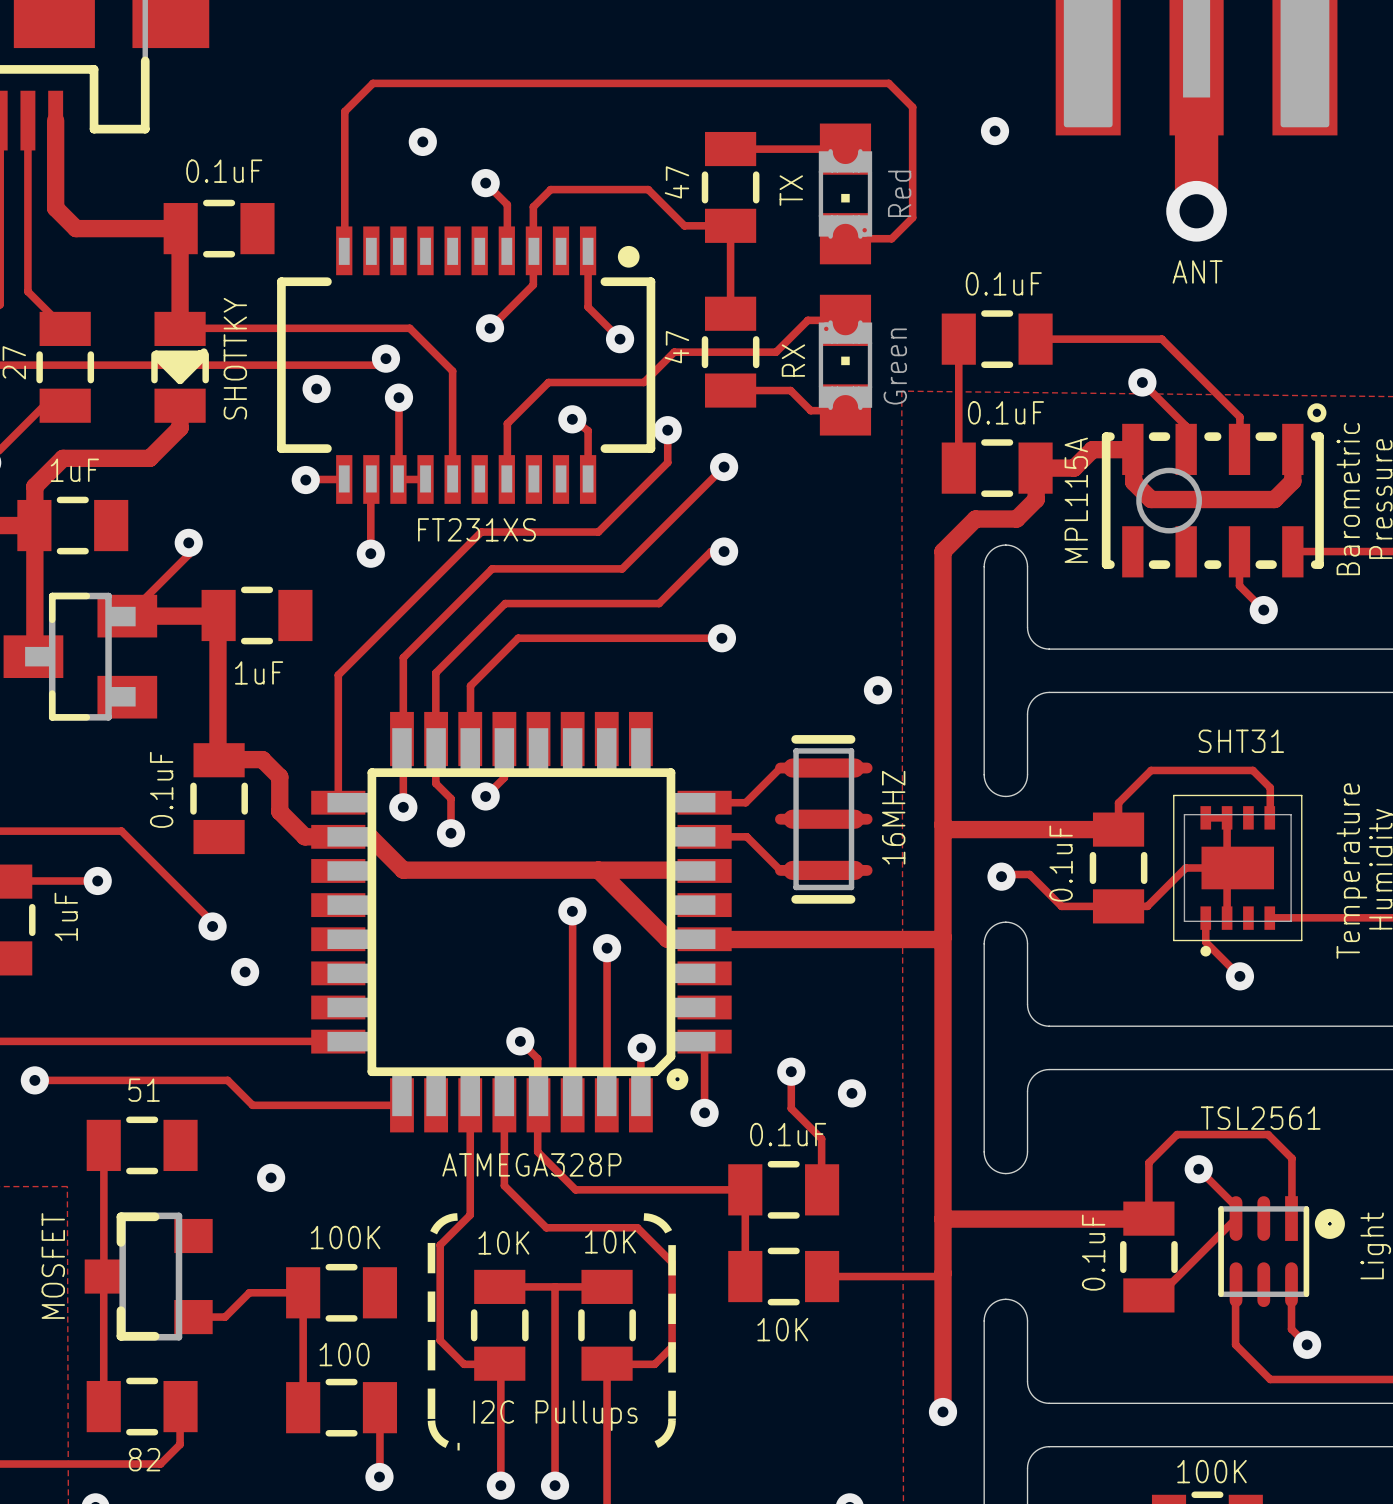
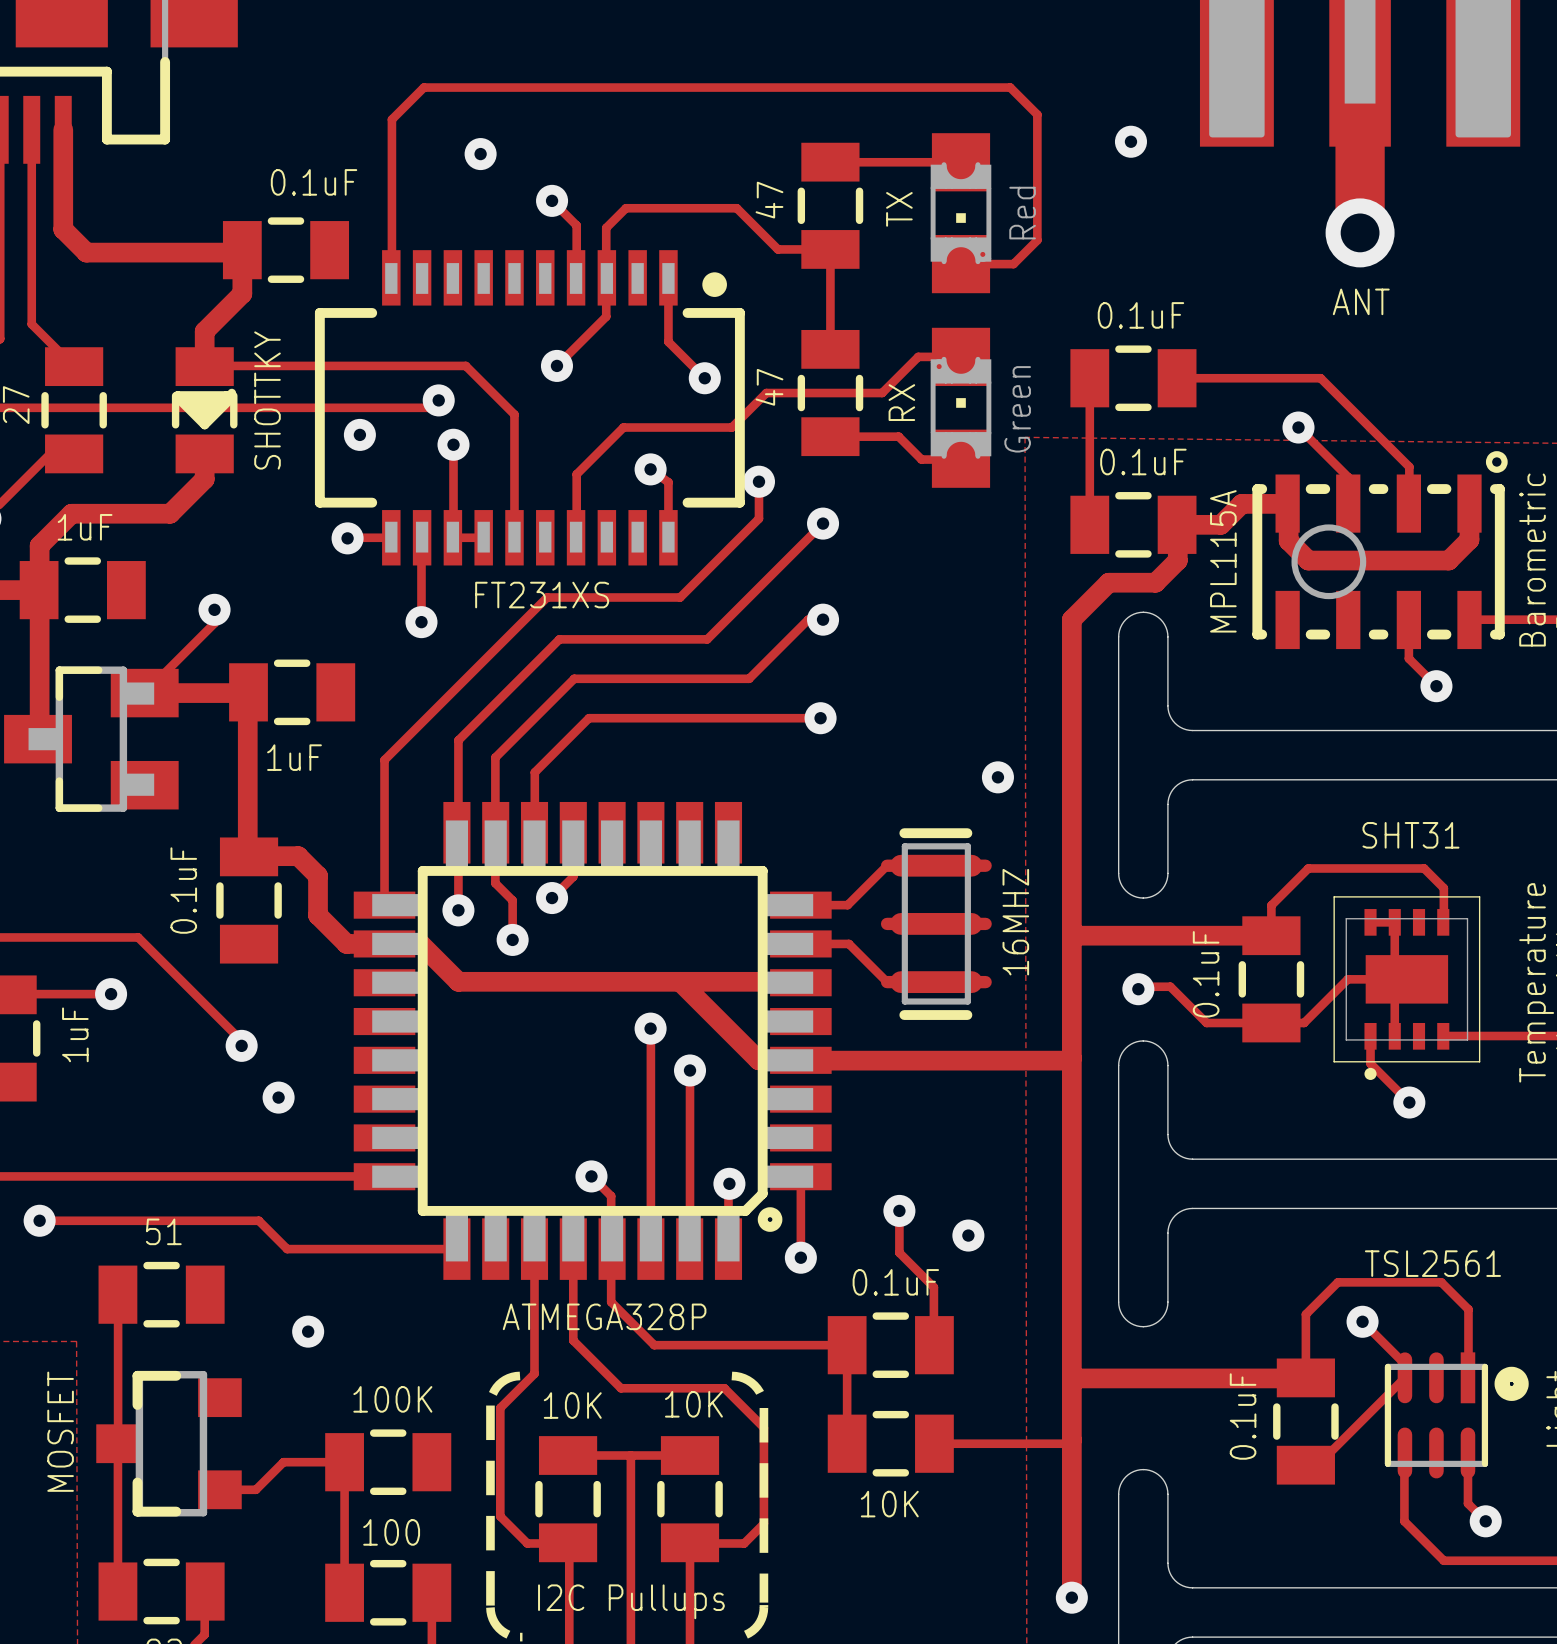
part value position: 0.1uF (224, 171) -> 0.1uF (314, 182)
track: (180, 228) (180, 297) -> (205, 252) (239, 252) (242, 250) (242, 293) (204, 331)
part position: (219, 228) -> (285, 250)

